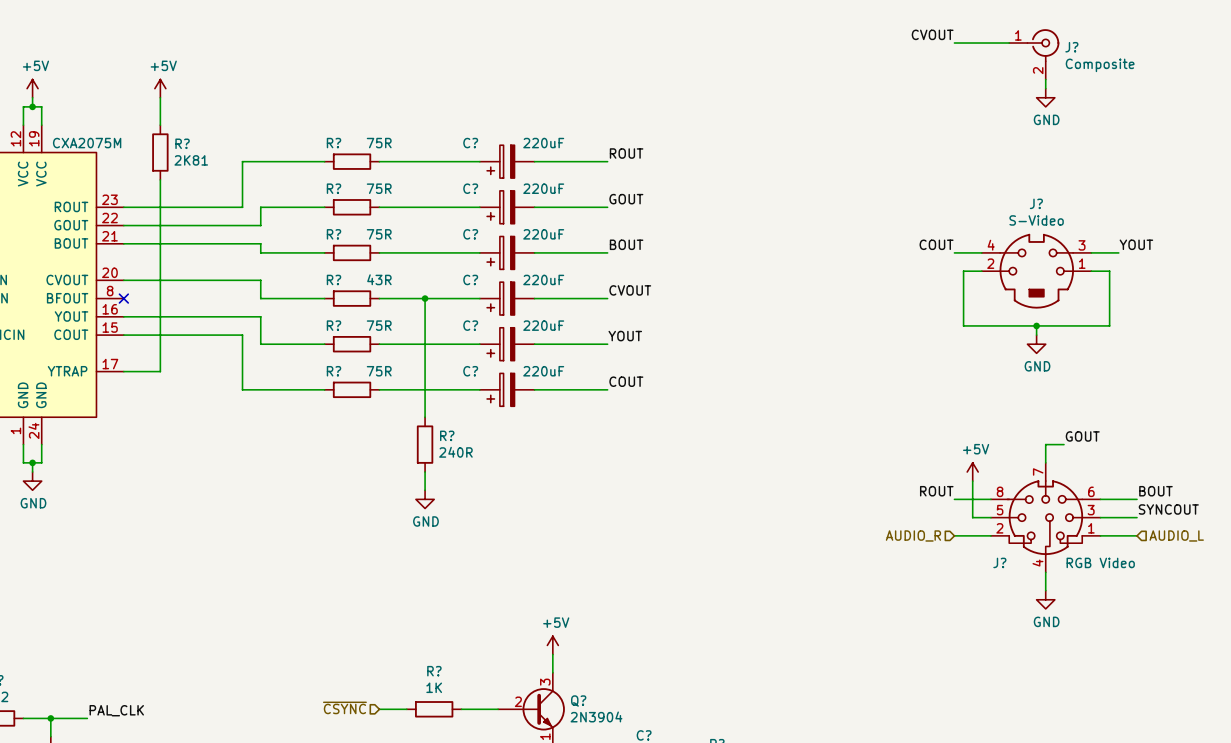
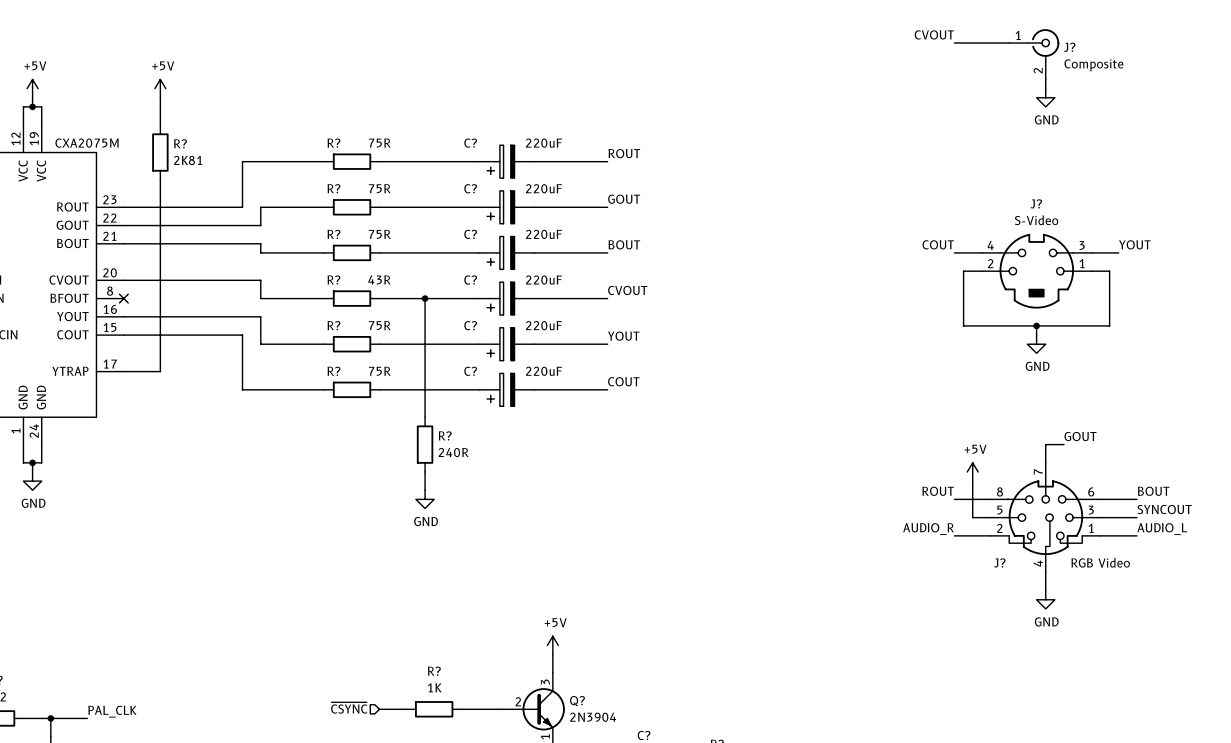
label: none -> AUDIO_R (928, 529)
label: none -> AUDIO_L (1162, 529)
hierarchical label: AUDIO_R (913, 535) -> none
hierarchical label: AUDIO_L (1176, 535) -> none

